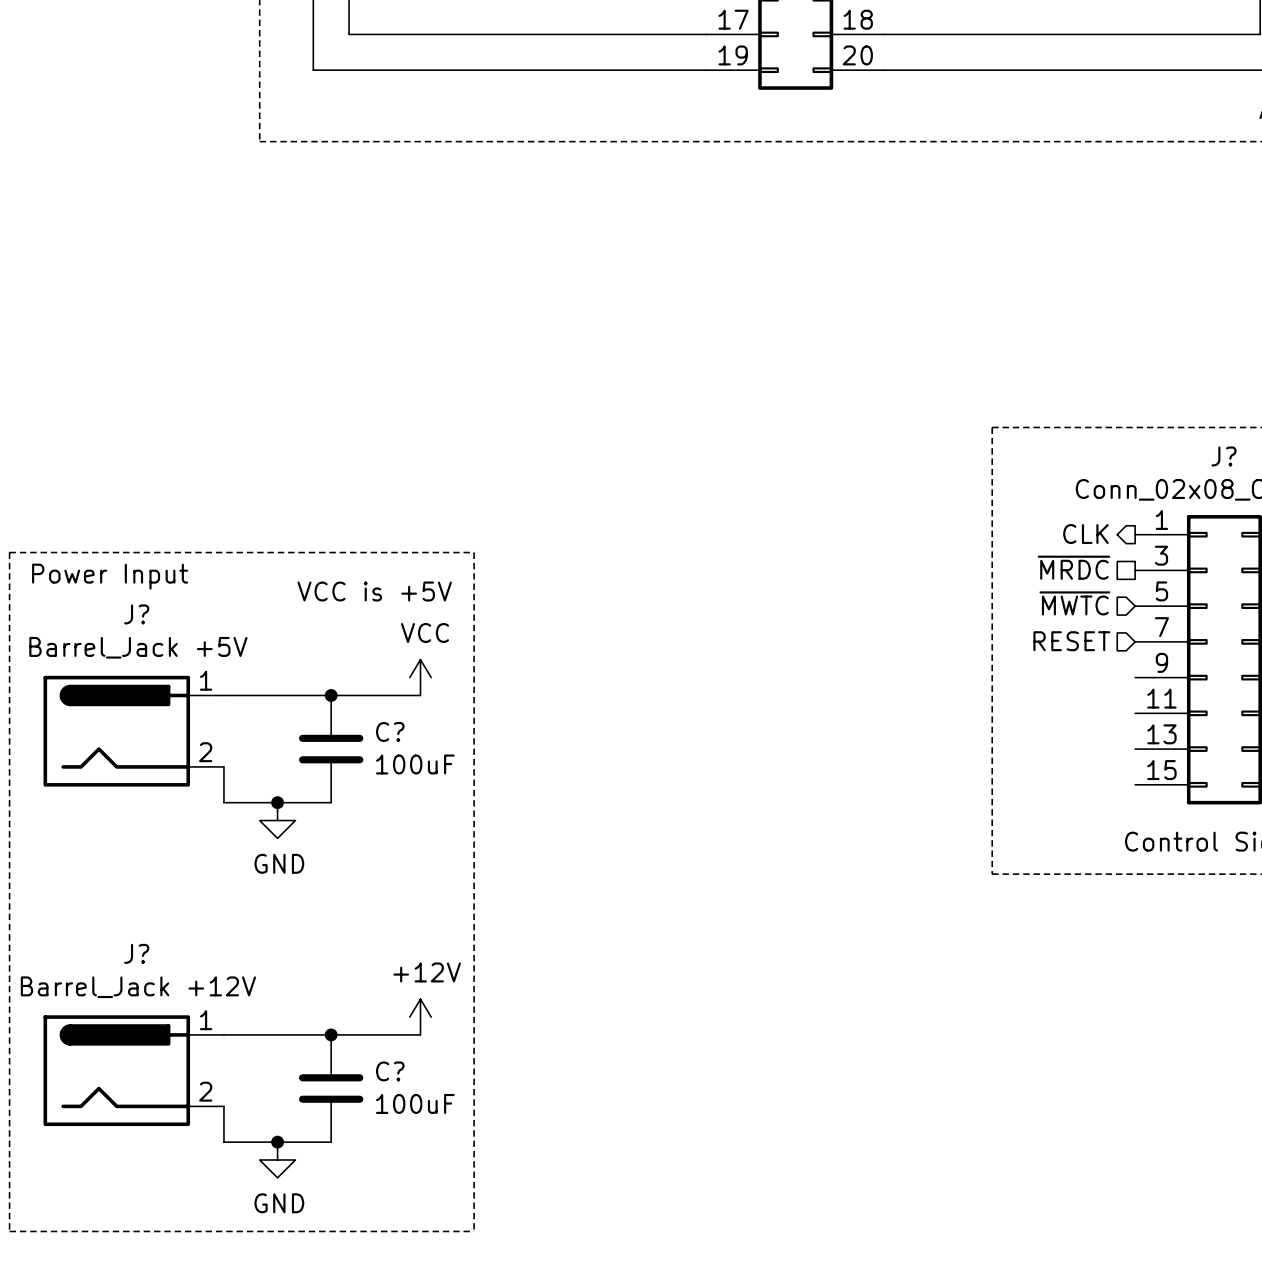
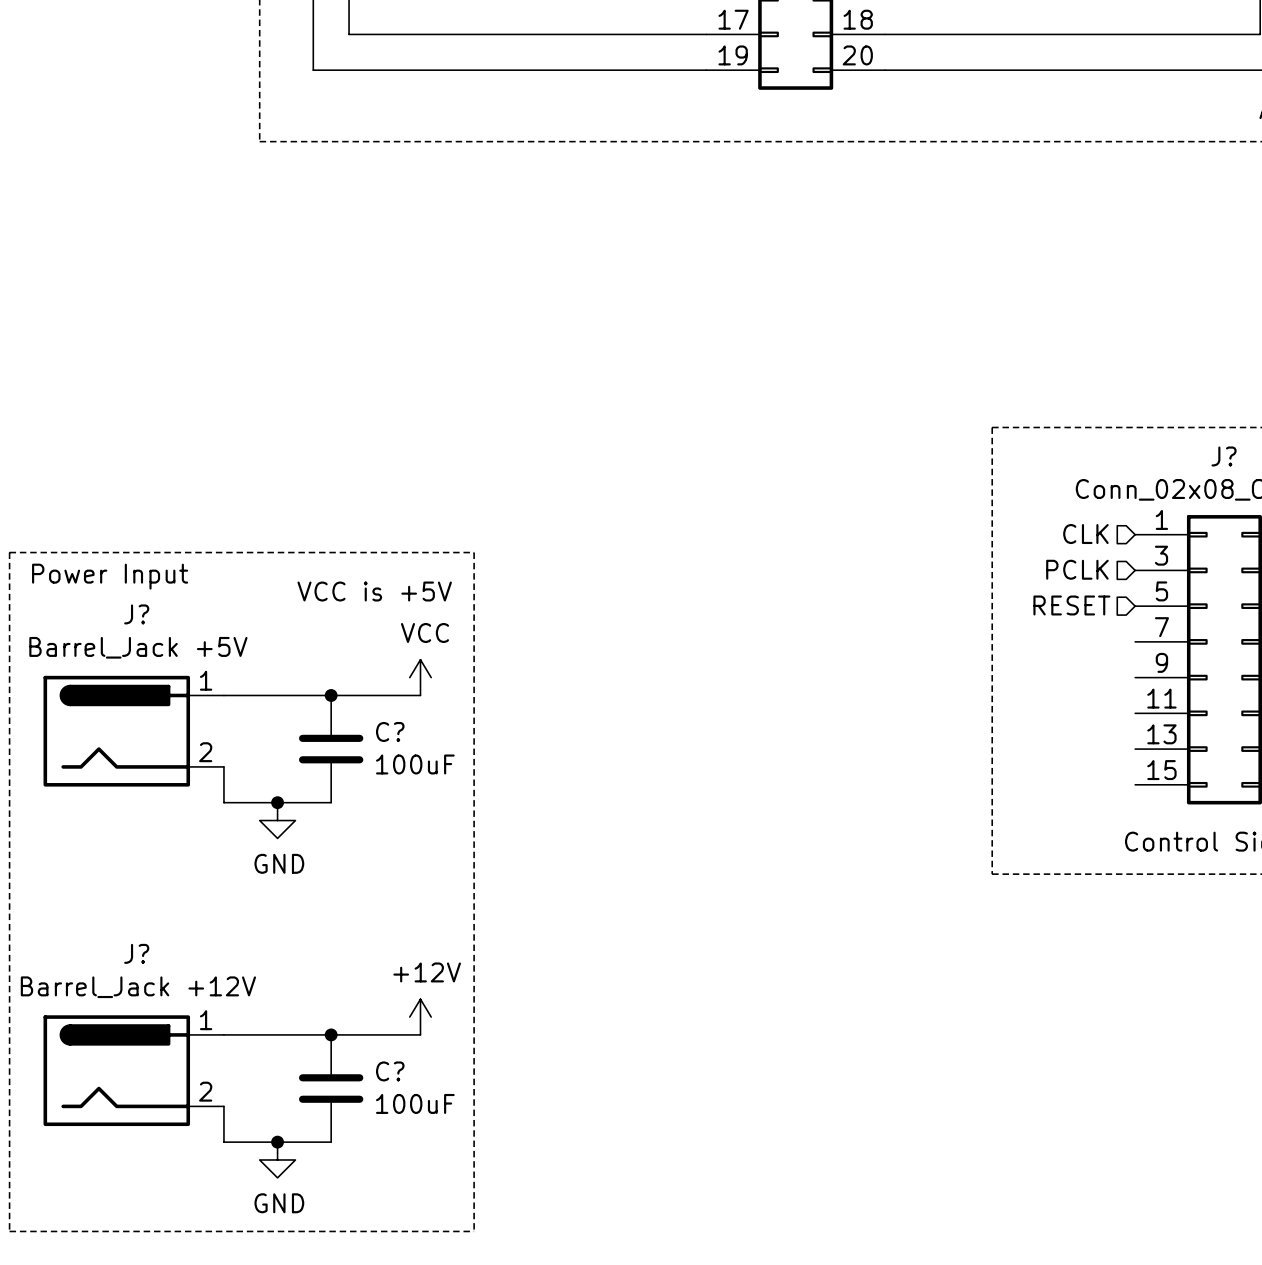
hierarchical label shape: output (1085, 534) -> input (1085, 534)
hierarchical label shape: passive (1074, 567) -> input (1077, 569)
hierarchical label: ~{MRDC} (1074, 567) -> PCLK (1077, 569)
hierarchical label: ~{MWTC} (1074, 603) -> RESET (1071, 605)
hierarchical label: RESET (1071, 641) -> none

